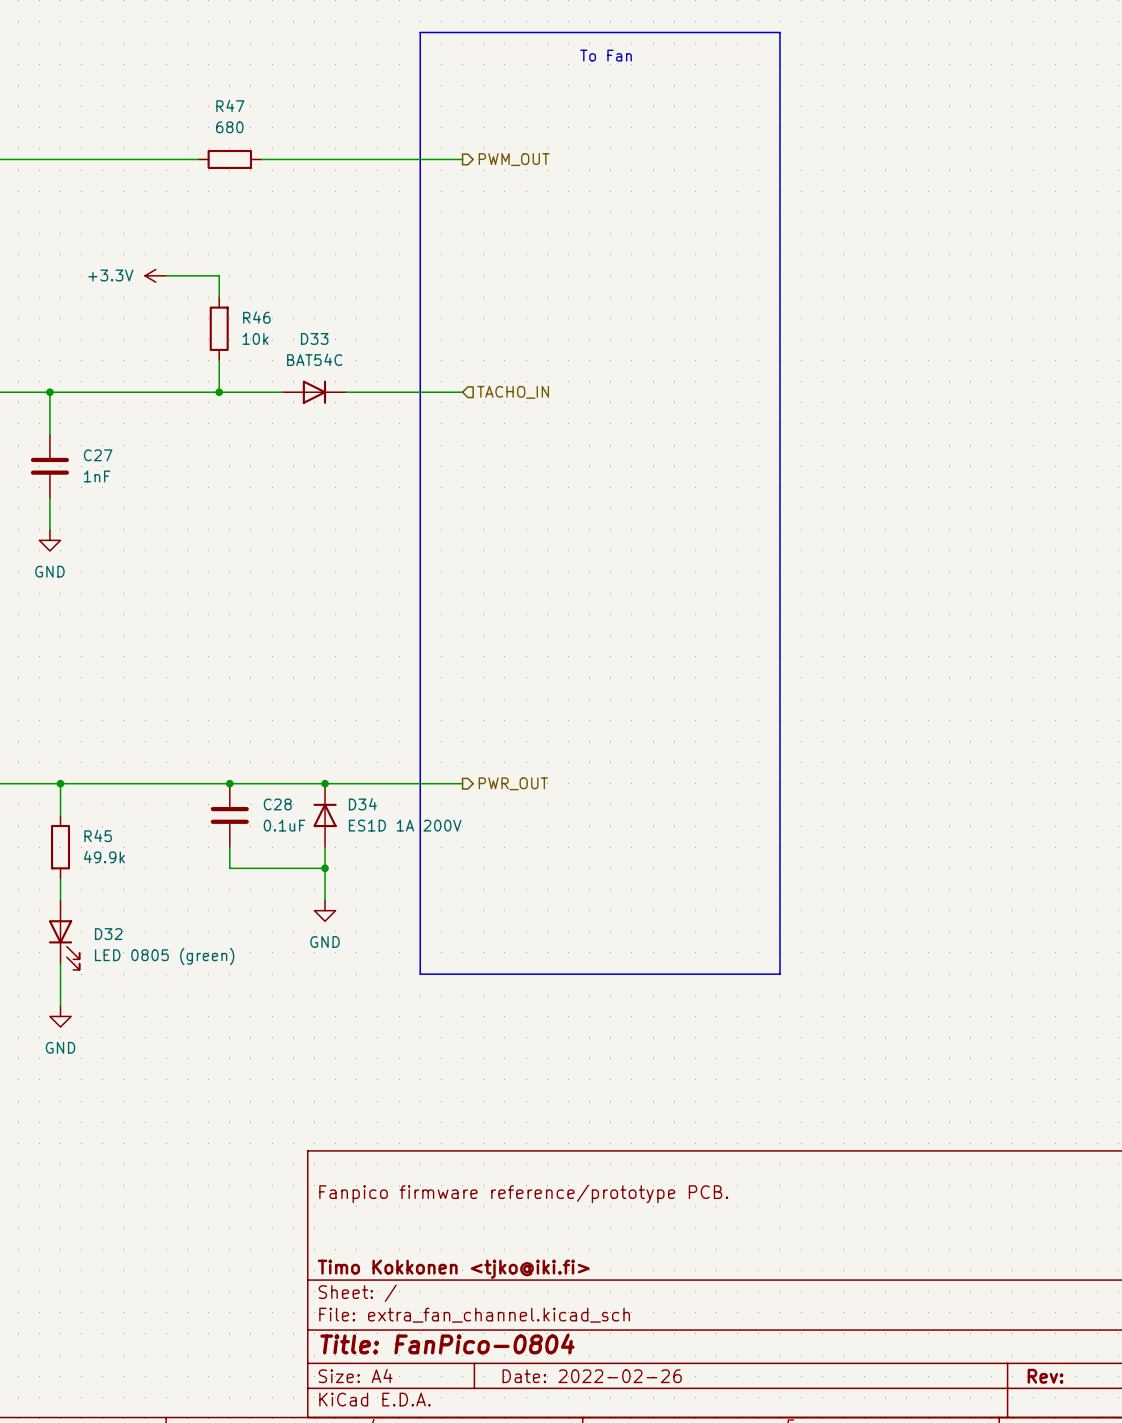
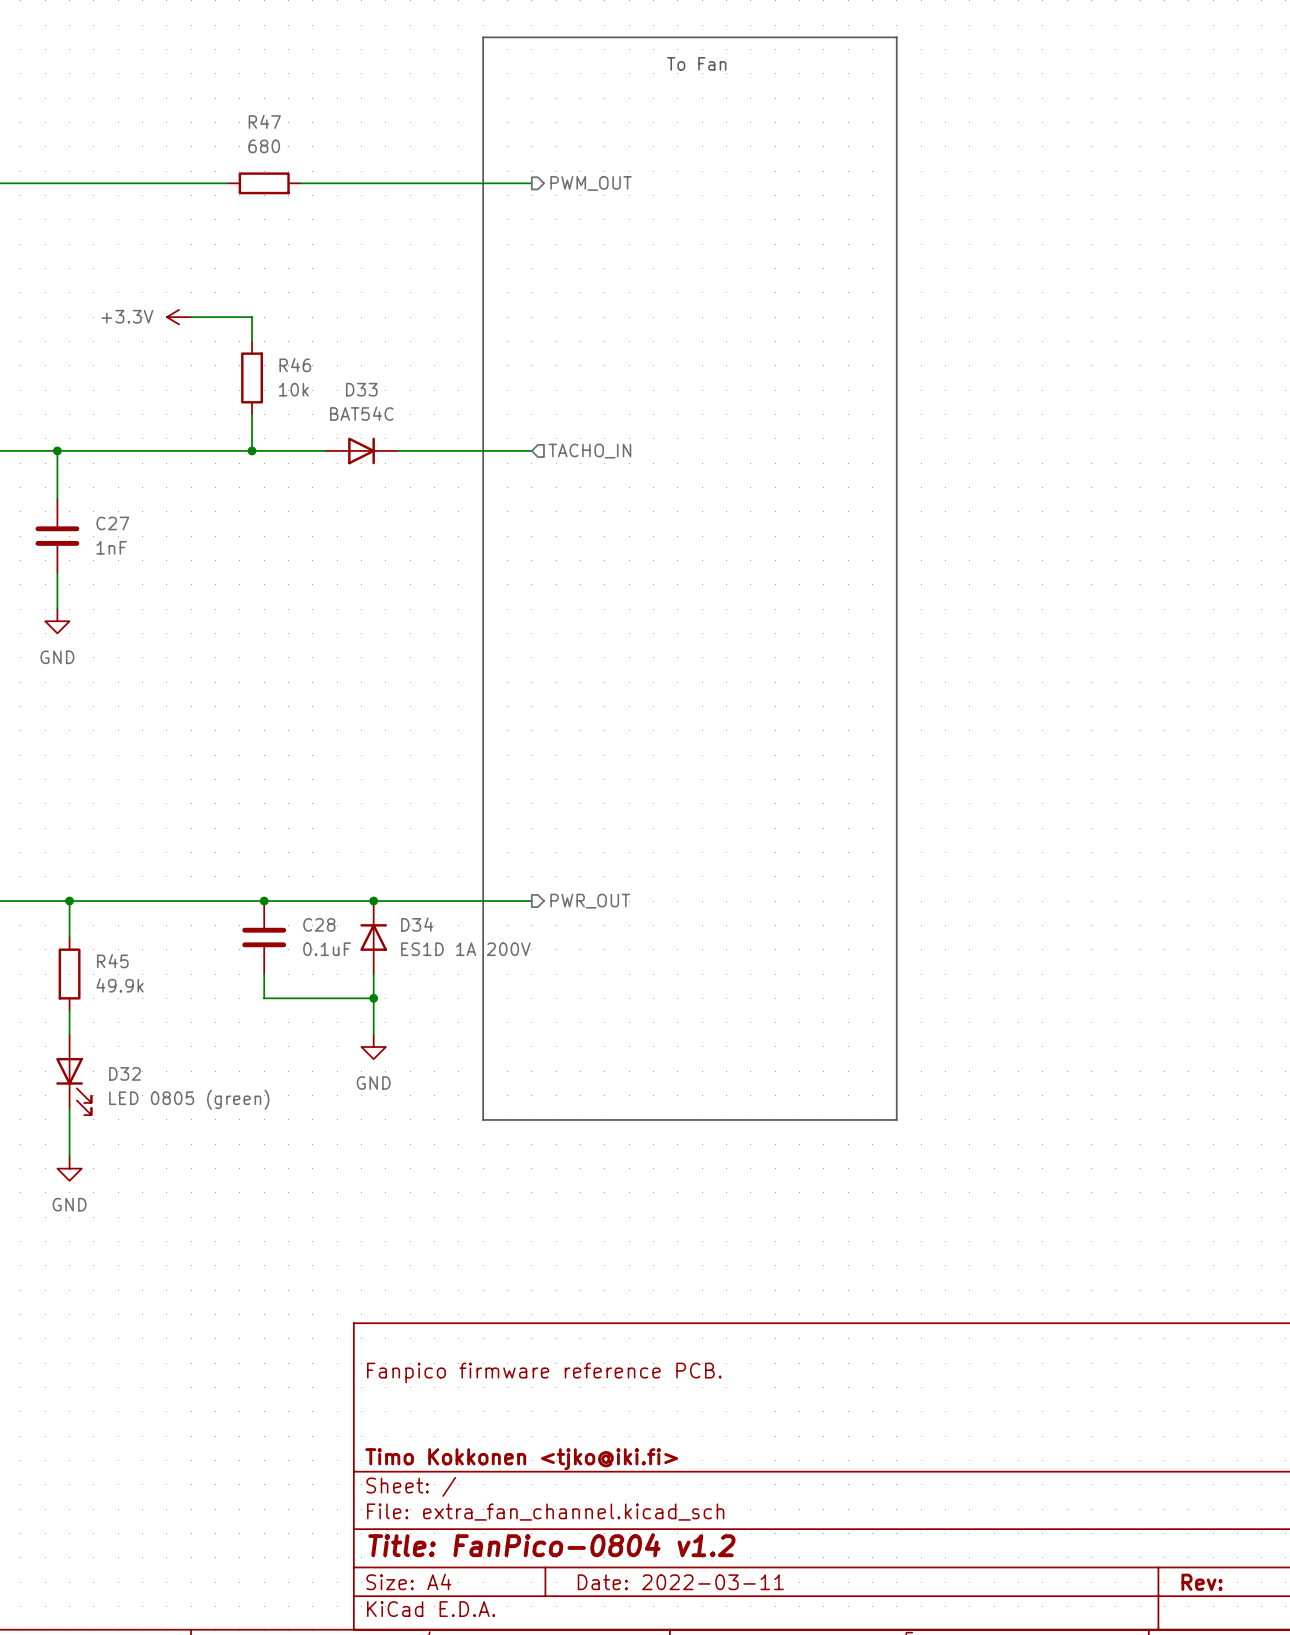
title block: Fanpico firmware reference/prototype PCB. (523, 1193) -> Fanpico firmware reference PCB. (544, 1372)
title block: Title: FanPico-0804 (447, 1344) -> Title: FanPico-0804 v1.2 (551, 1545)
title block: Date: 2022-02-26 (592, 1376) -> Date: 2022-03-11 (680, 1582)

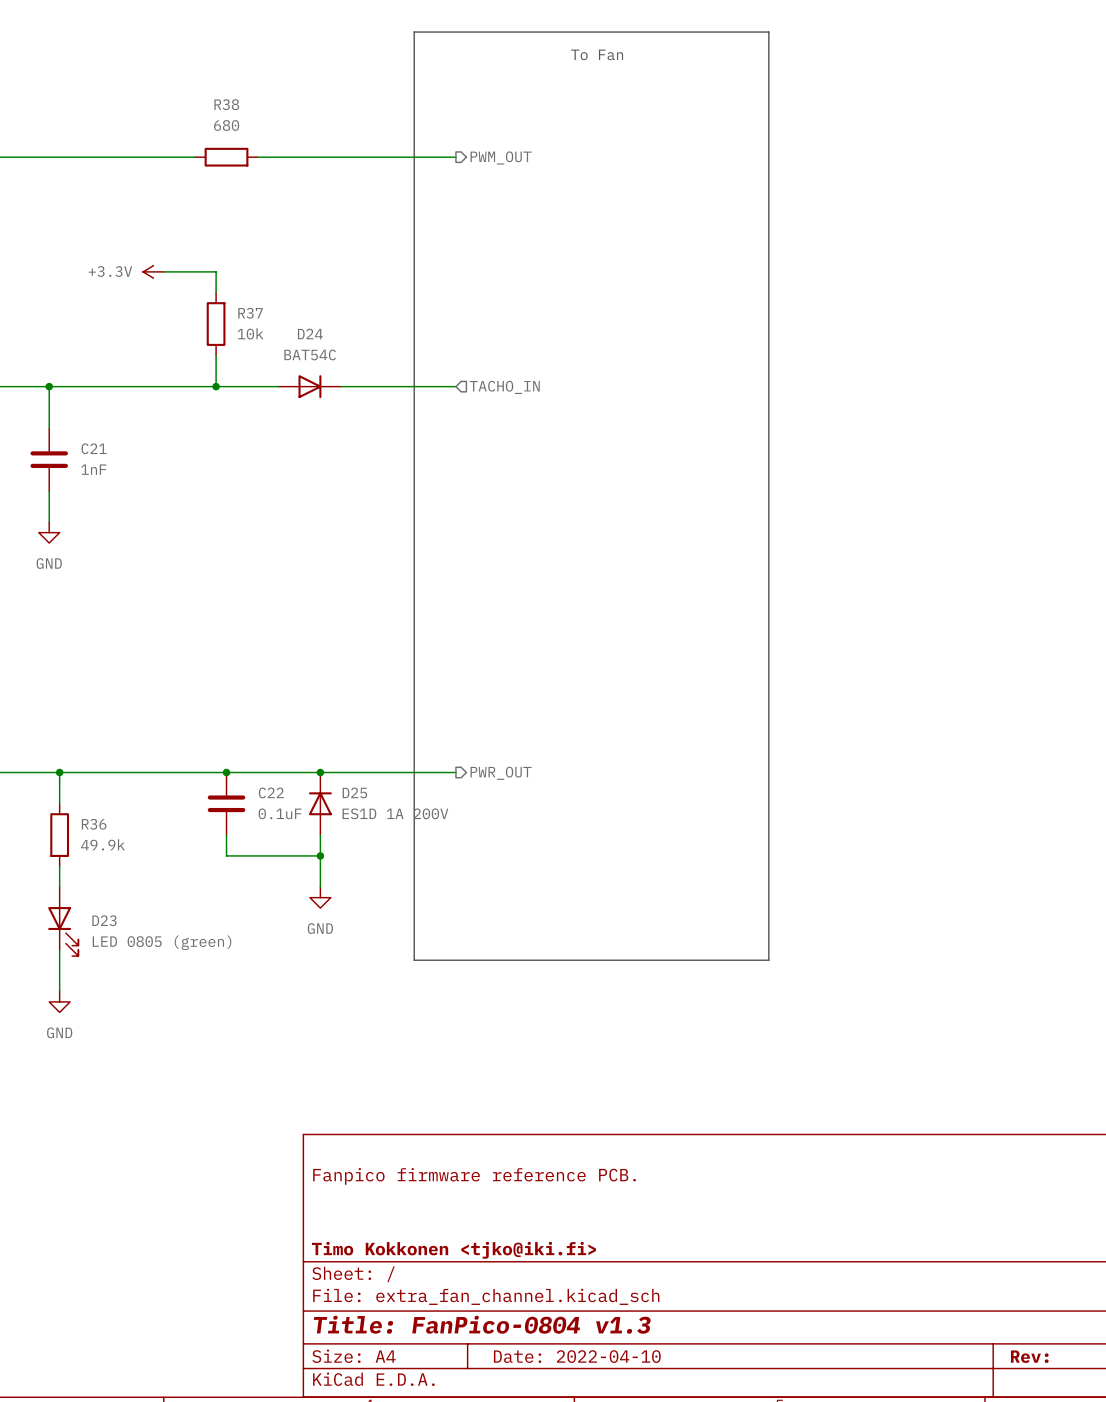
R47 name: R47 (264, 121) -> R38 (226, 104)
R46 name: R46 (295, 365) -> R37 (250, 313)
D33 name: D33 (361, 389) -> D24 (310, 334)
C27 name: C27 (112, 523) -> C21 (94, 448)
C28 name: C28 (319, 924) -> C22 (271, 792)
D34 name: D34 (417, 924) -> D25 (354, 792)
R45 name: R45 (112, 961) -> R36 (94, 824)
D32 name: D32 (124, 1073) -> D23 (104, 920)
title block: Title: FanPico-0804 v1.2 (551, 1545) -> Title: FanPico-0804 v1.3 (482, 1324)
title block: Date: 2022-03-11 (680, 1582) -> Date: 2022-04-10 (577, 1356)

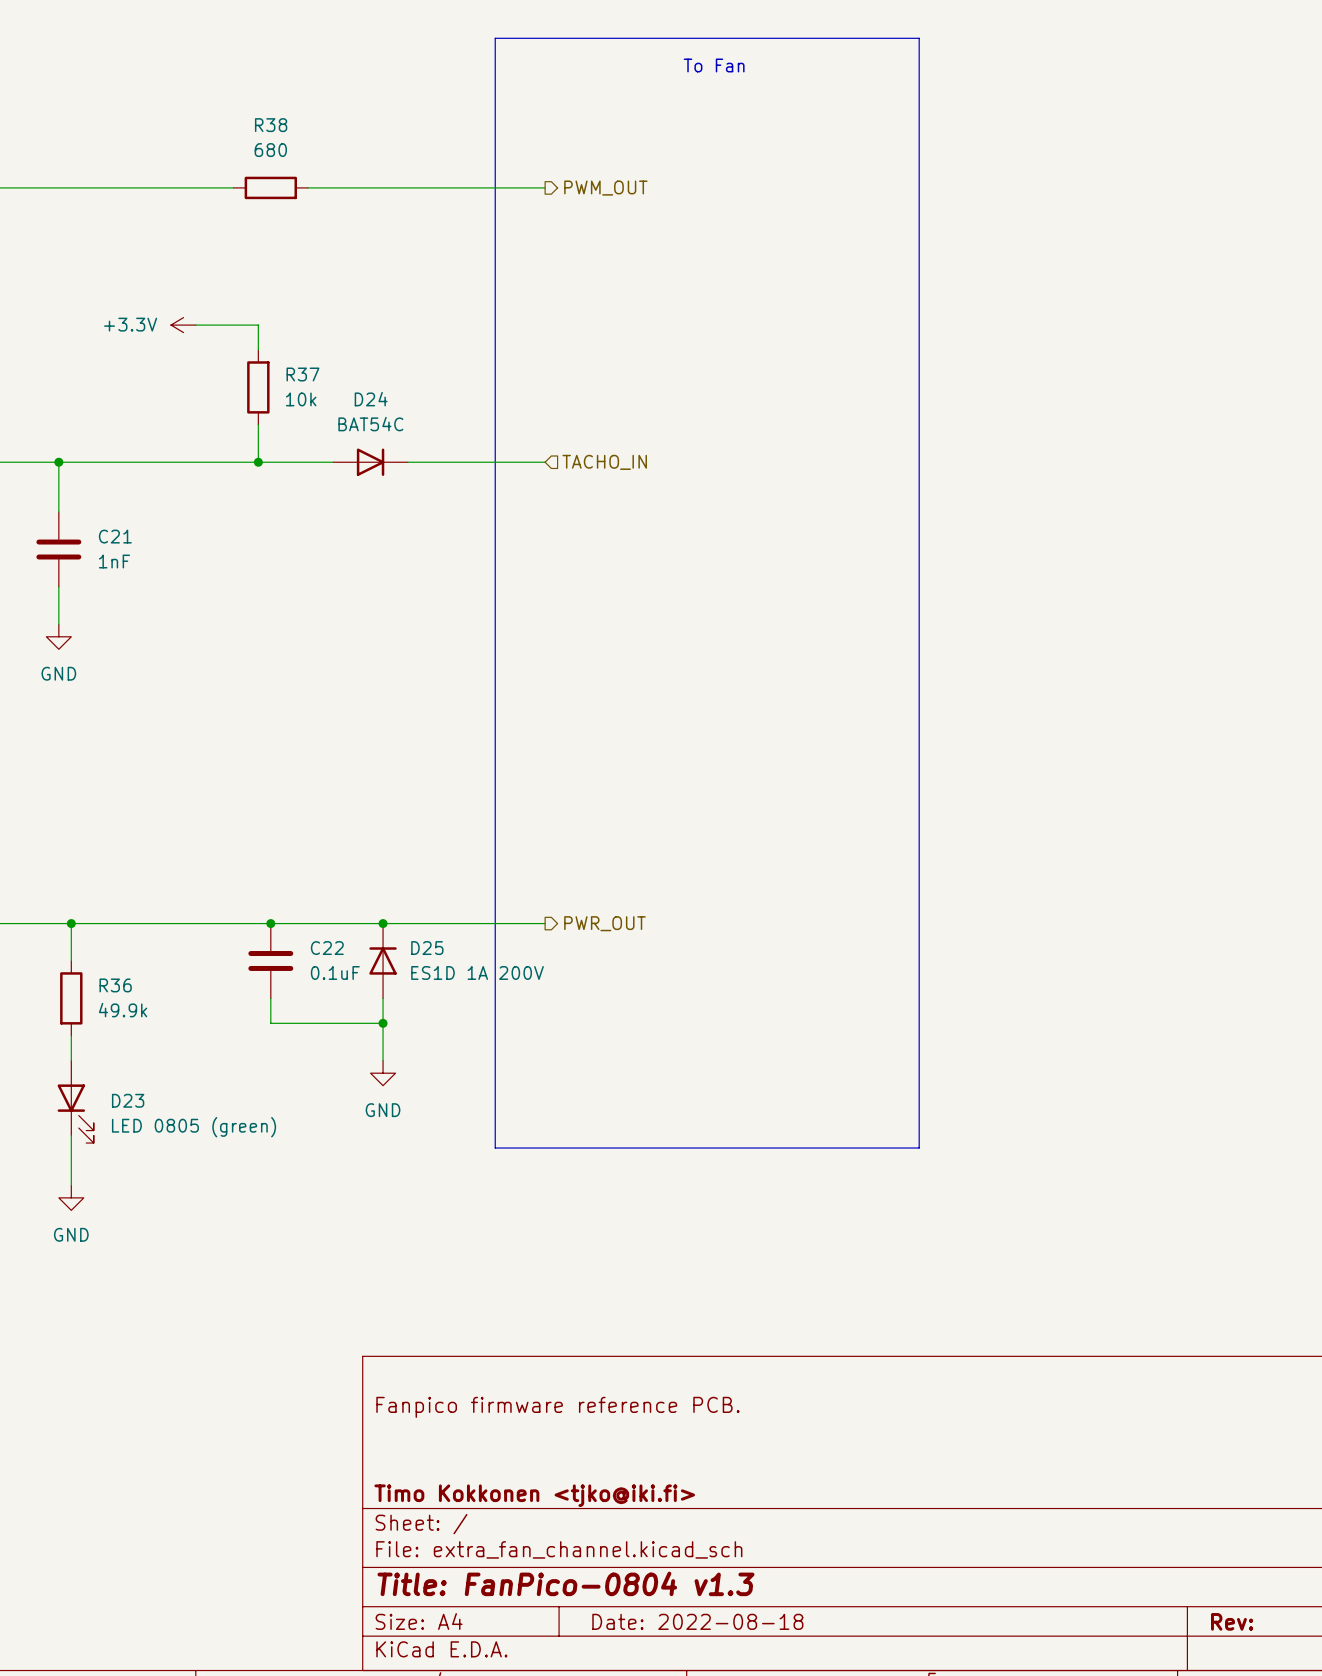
title block: Date: 2022-04-10 (577, 1356) -> Date: 2022-08-18 (697, 1621)

